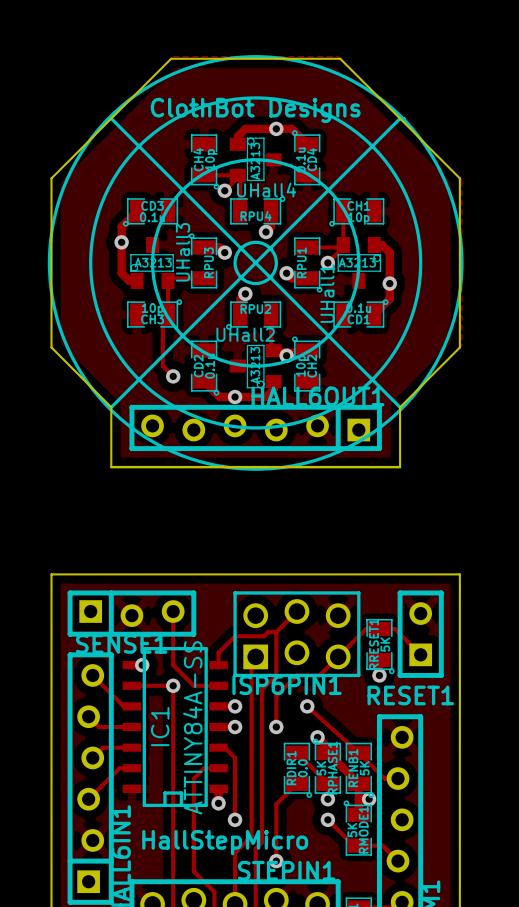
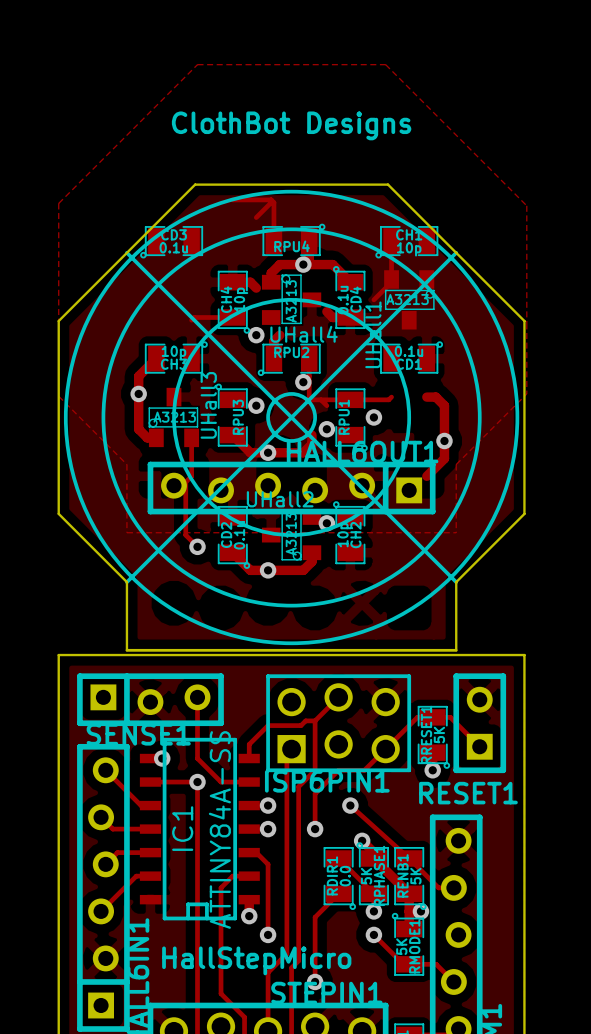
drawing: [47, 55, 464, 471] -> none
line: (111, 118) (400, 407) -> (126, 252) (456, 582)
line: (404, 118) (400, 118) (111, 407) -> none
via: (276, 128) -> none
track: (237, 144) (237, 136) (245, 128) (291, 128) (307, 144) -> none
CD4 position: (306, 157) -> (349, 297)
UHall4 position: (255, 159) -> (291, 299)
CH4 position: (205, 161) -> (233, 302)
drawing: none -> [63, 189, 520, 646]
via: (224, 190) -> none
track: (137, 211) (121, 226) (121, 273) (129, 280) (137, 280) -> (156, 358) (138, 376) (138, 429) (147, 437) (156, 437)
line: none -> (456, 252) (126, 582)
via: (121, 242) -> none
track: (343, 245) (340, 247) (307, 247) -> (271, 282) (271, 273) (279, 264) (332, 264) (350, 282)
track: (374, 245) (382, 245) (389, 252) (389, 299) (374, 314) -> (426, 397) (435, 397) (444, 405) (444, 458) (426, 476)
via: (224, 252) -> none
RPU3 position: (203, 260) -> (231, 415)
UHall3 position: (152, 262) -> (173, 417)
drawing position: (255, 262) -> (291, 417)
drawing position: (255, 262) -> (291, 417)
drawing position: (255, 262) -> (291, 417)
via: (327, 262) -> none
RPU1 position: (308, 265) -> (351, 419)
via: (286, 273) -> none
track: (170, 280) (168, 280) (168, 314) (162, 319) (162, 366) (173, 376) -> (194, 437) (191, 437) (191, 476) (185, 482) (185, 535) (197, 546)
board edge: (51, 281) (51, 178) (171, 58) (340, 58) (459, 178) (459, 281) -> (58, 321) (195, 184) (388, 184) (524, 321)
via: (389, 283) -> none
via: none -> (256, 335)
via: (245, 293) -> none
via: none -> (303, 382)
via: none -> (138, 393)
board edge: (51, 347) (111, 407) (111, 467) (400, 467) (400, 407) (459, 347) -> (58, 396) (58, 513) (126, 582) (126, 650) (456, 650) (456, 582) (524, 513) (524, 396)
track: none -> (391, 397) (388, 399) (350, 399)
via: none -> (256, 405)
via: (286, 355) -> none
CH2 position: (306, 364) -> (349, 532)
UHall2 position: (255, 366) -> (291, 535)
via: none -> (373, 417)
CD2 position: (205, 368) -> (233, 537)
via: (173, 376) -> none
via: none -> (326, 429)
via: none -> (444, 440)
via: none -> (326, 523)
via: none -> (197, 546)
track: none -> (232, 552) (250, 570) (303, 570) (311, 561) (311, 552)
via: none -> (268, 570)

